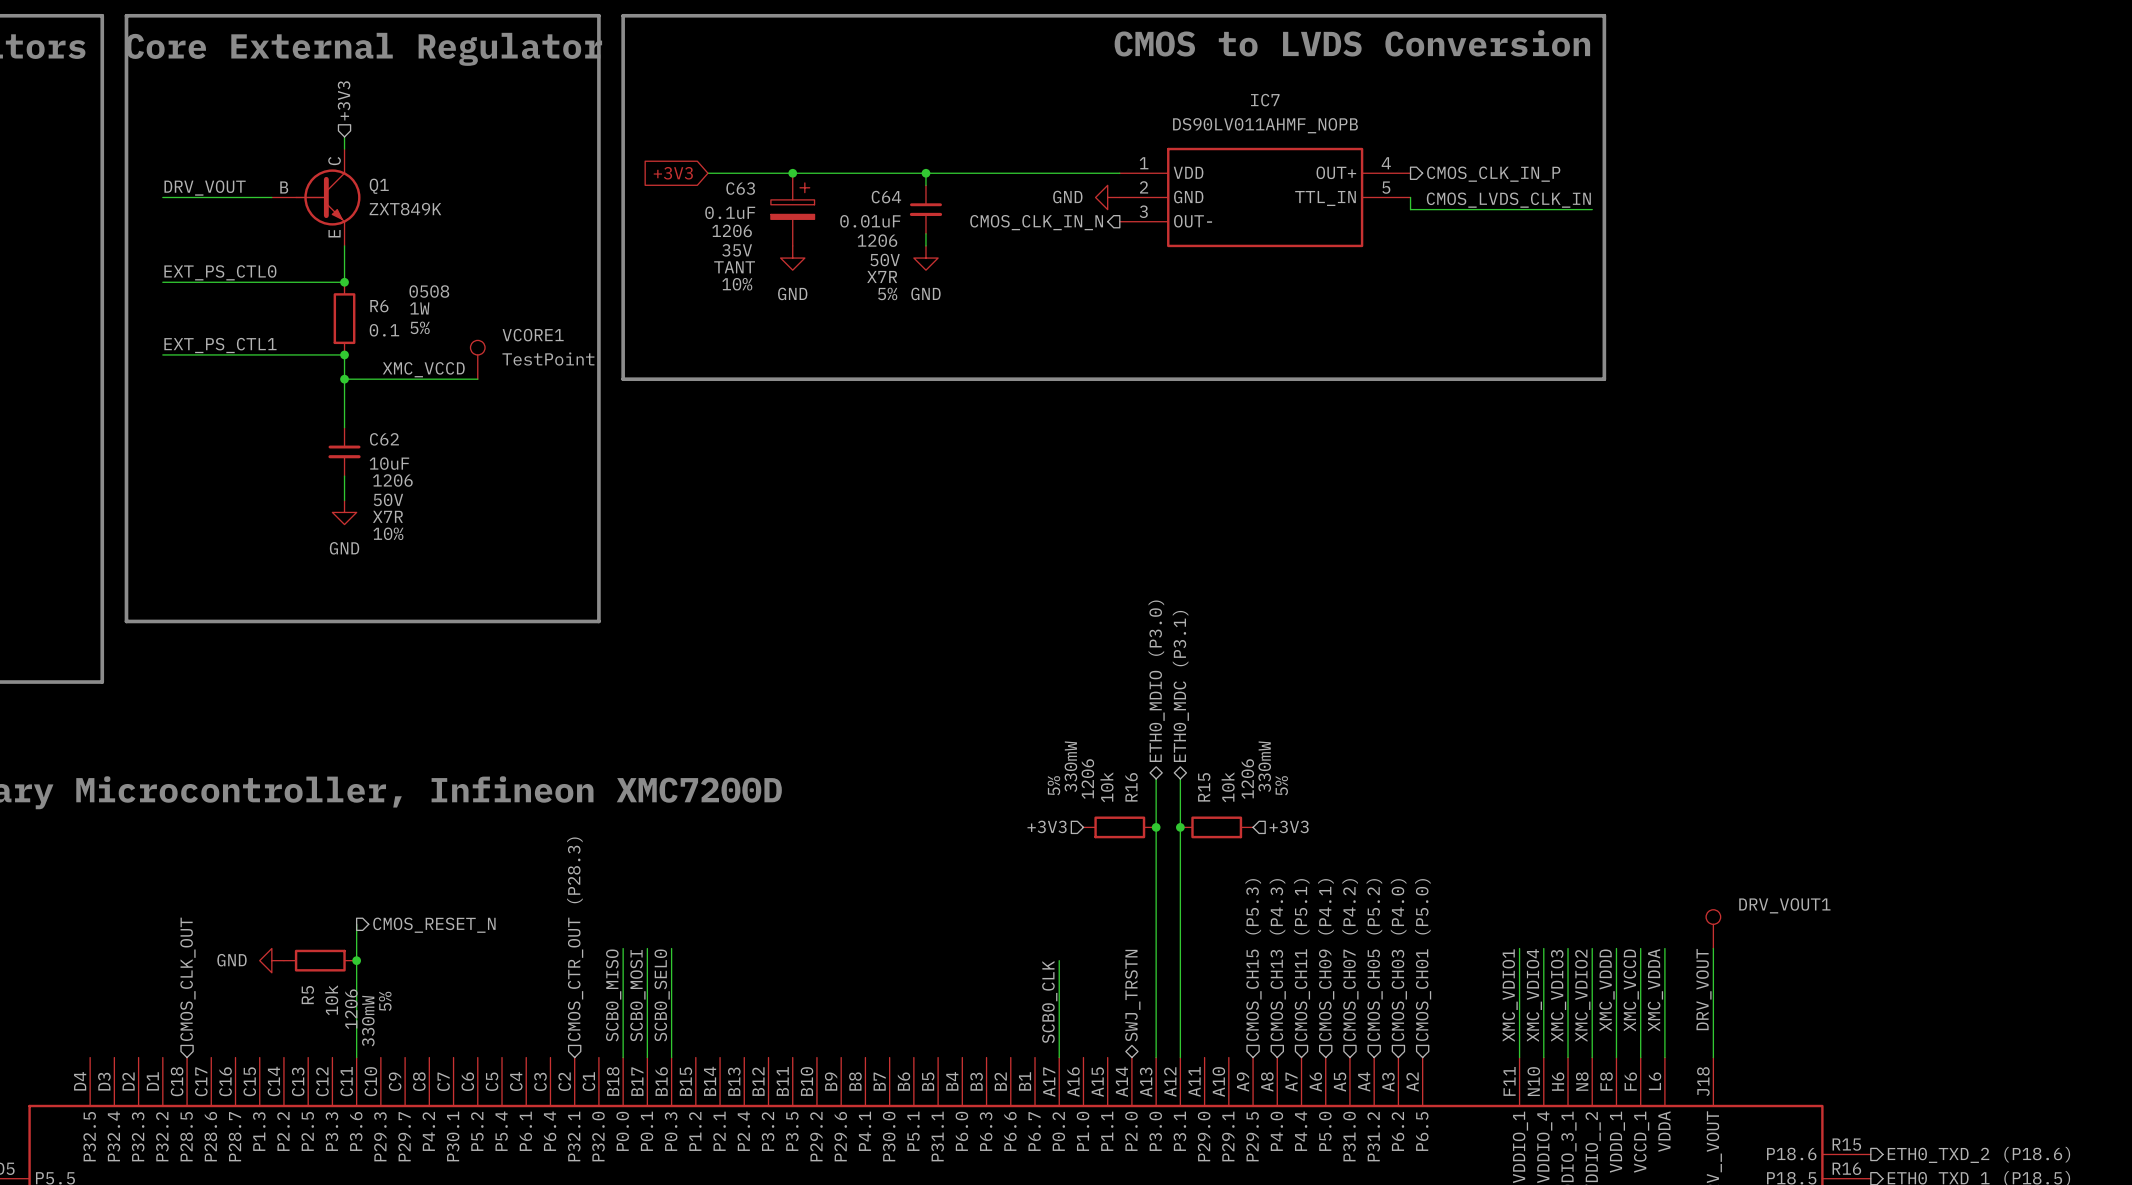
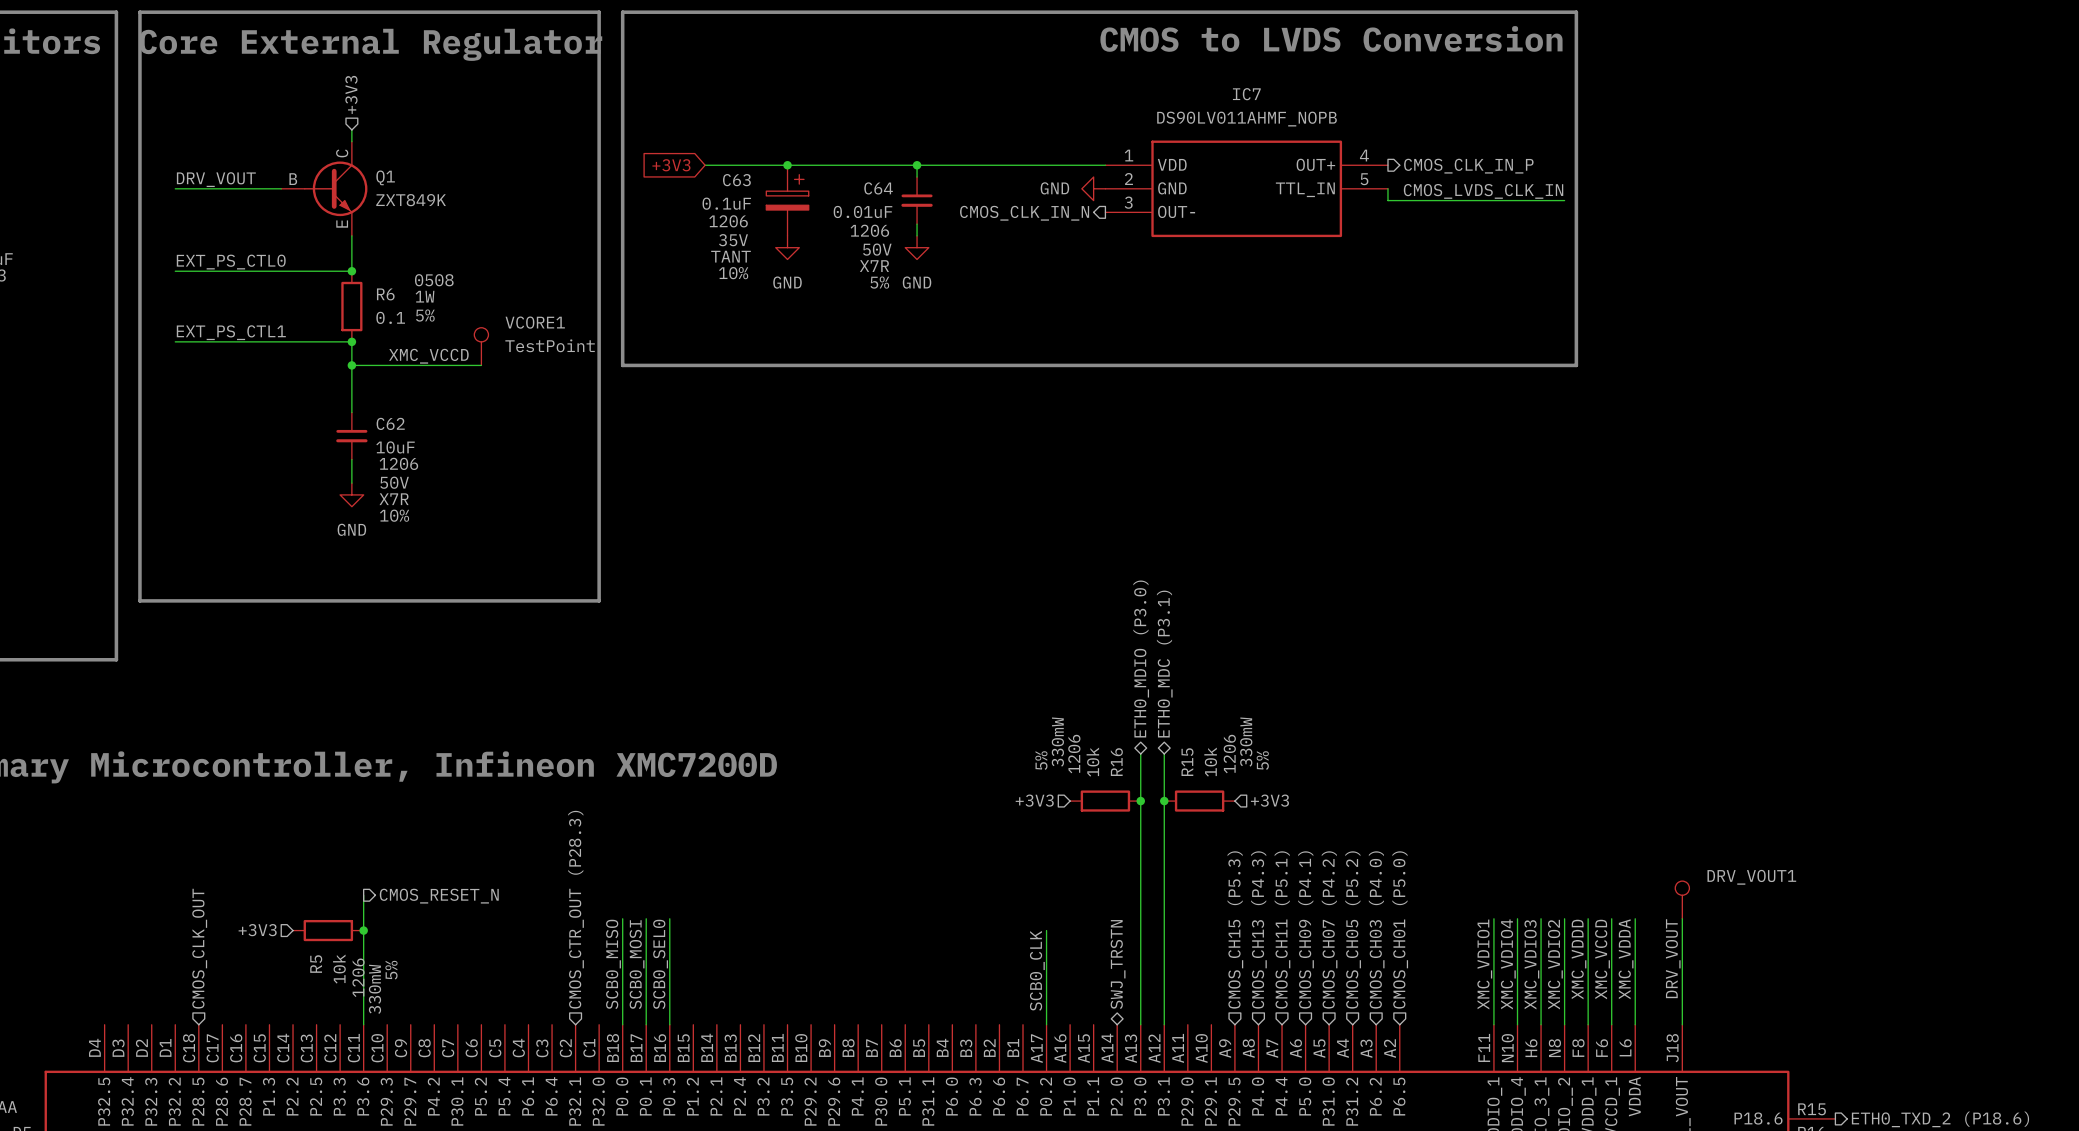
hierarchical label: none -> +3V3 (257, 930)
power symbol: GND (271, 960) -> none

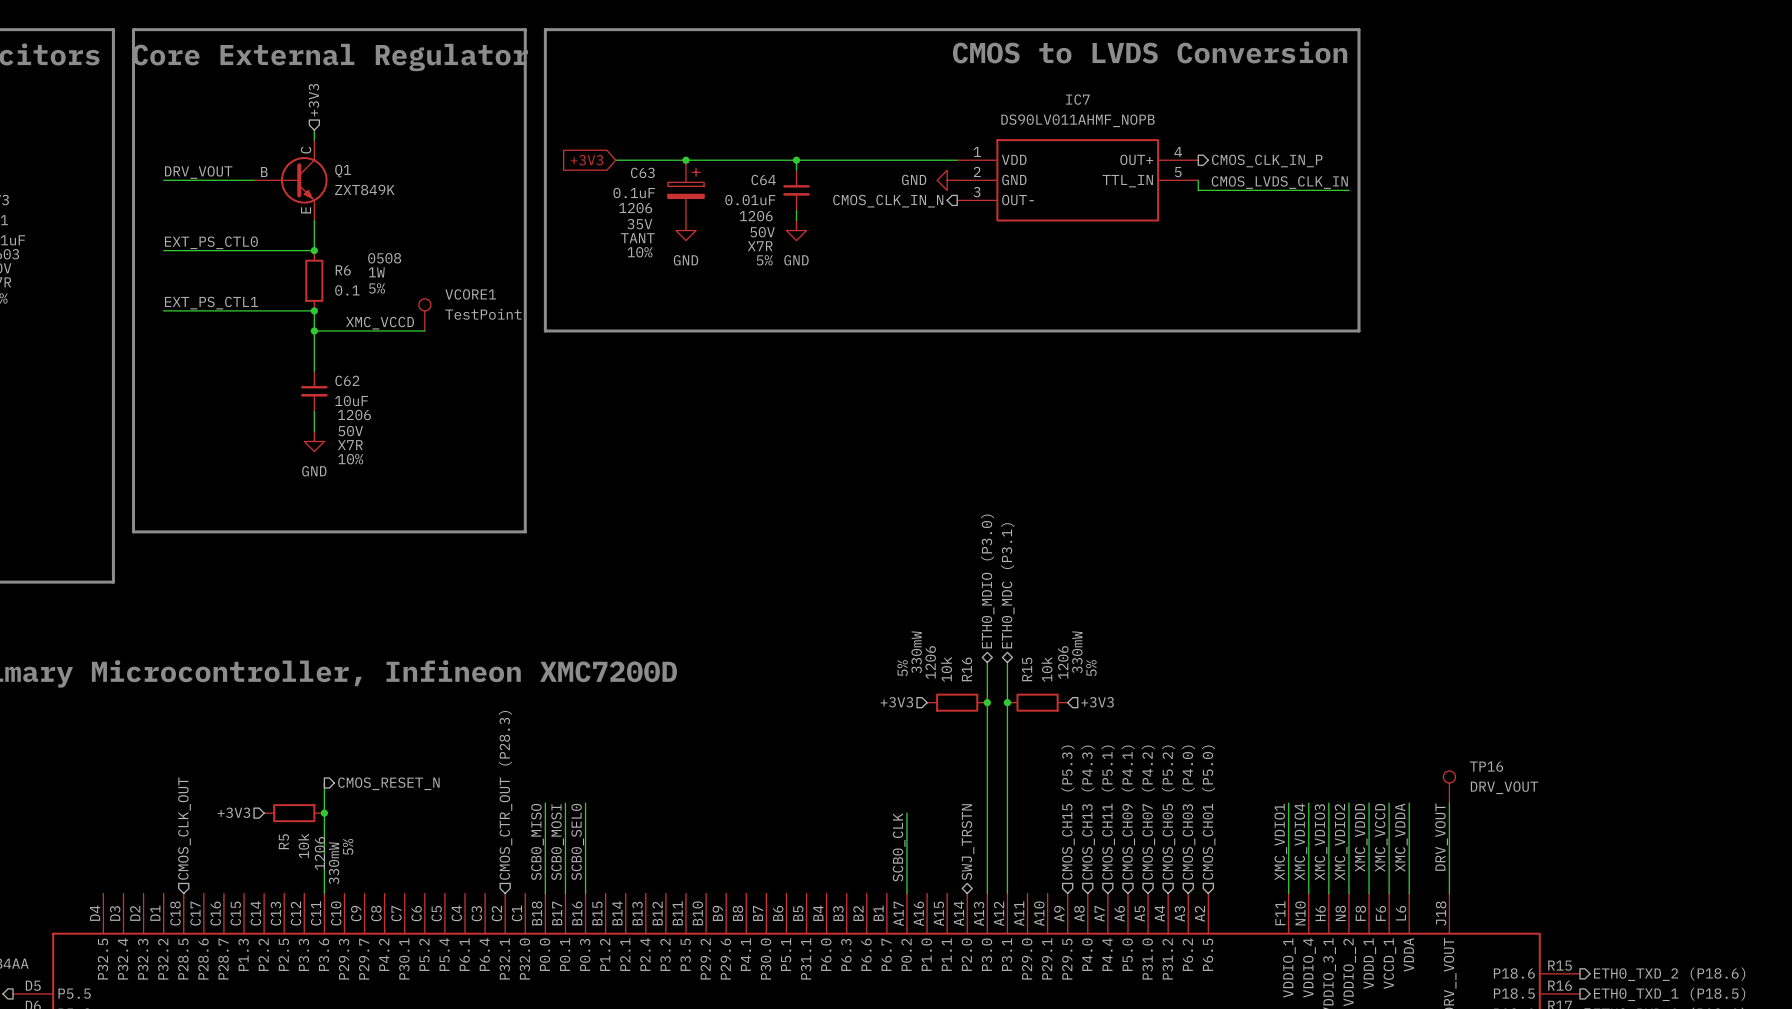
DRV_VOUT1 name: DRV_VOUT1 (1751, 877) -> TP16 (1486, 766)
DRV_VOUT1 value: none -> DRV_VOUT (1504, 787)

